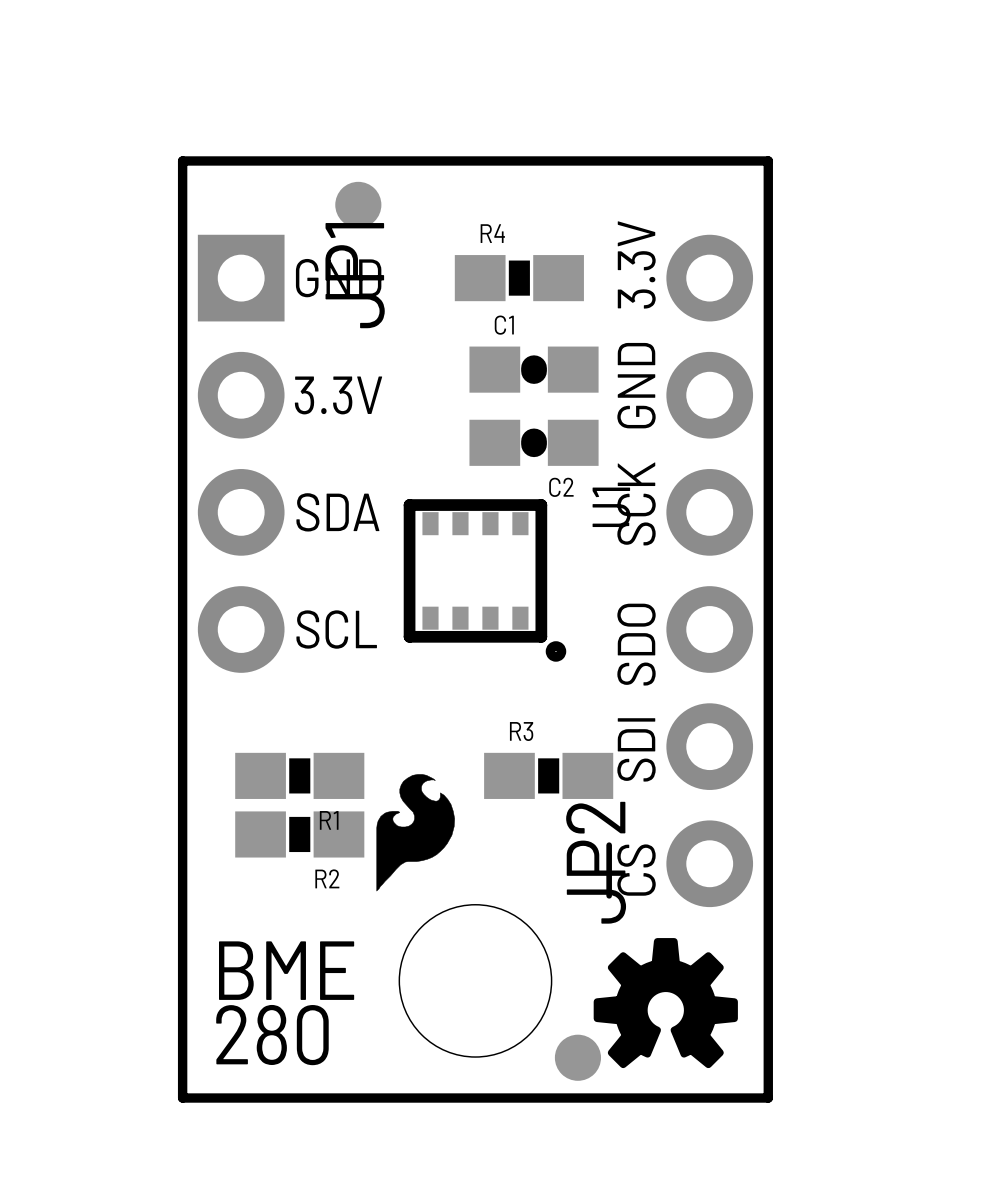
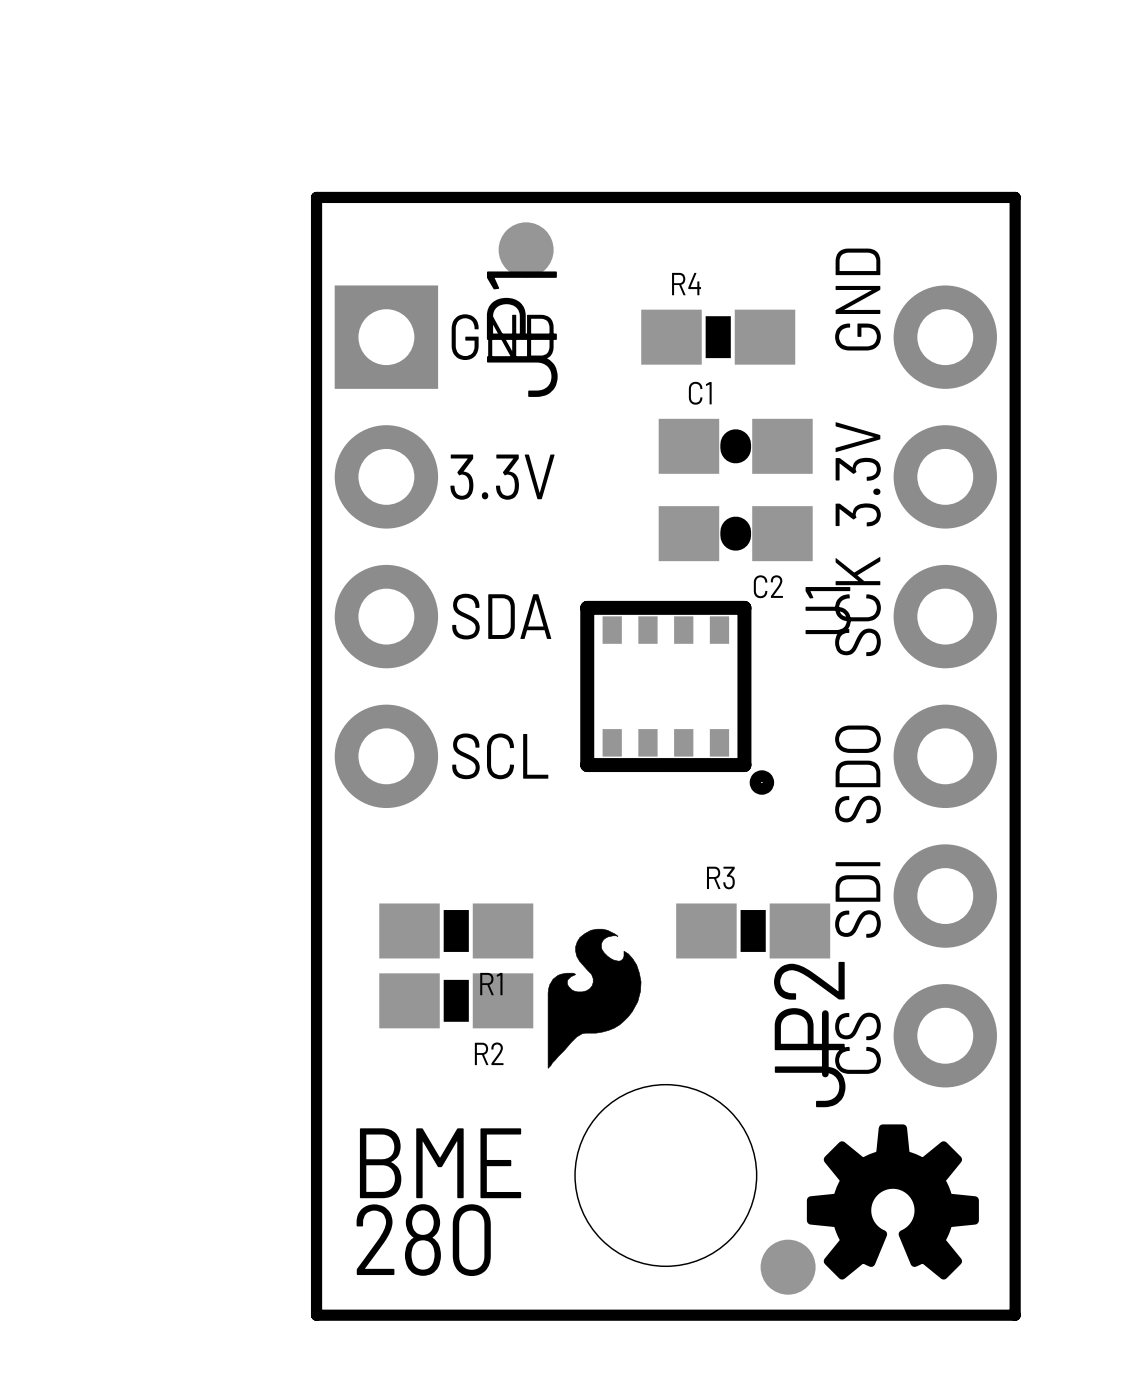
text: 3.3V (636, 264) -> GND (857, 299)
text: GND (636, 385) -> 3.3V (858, 474)

